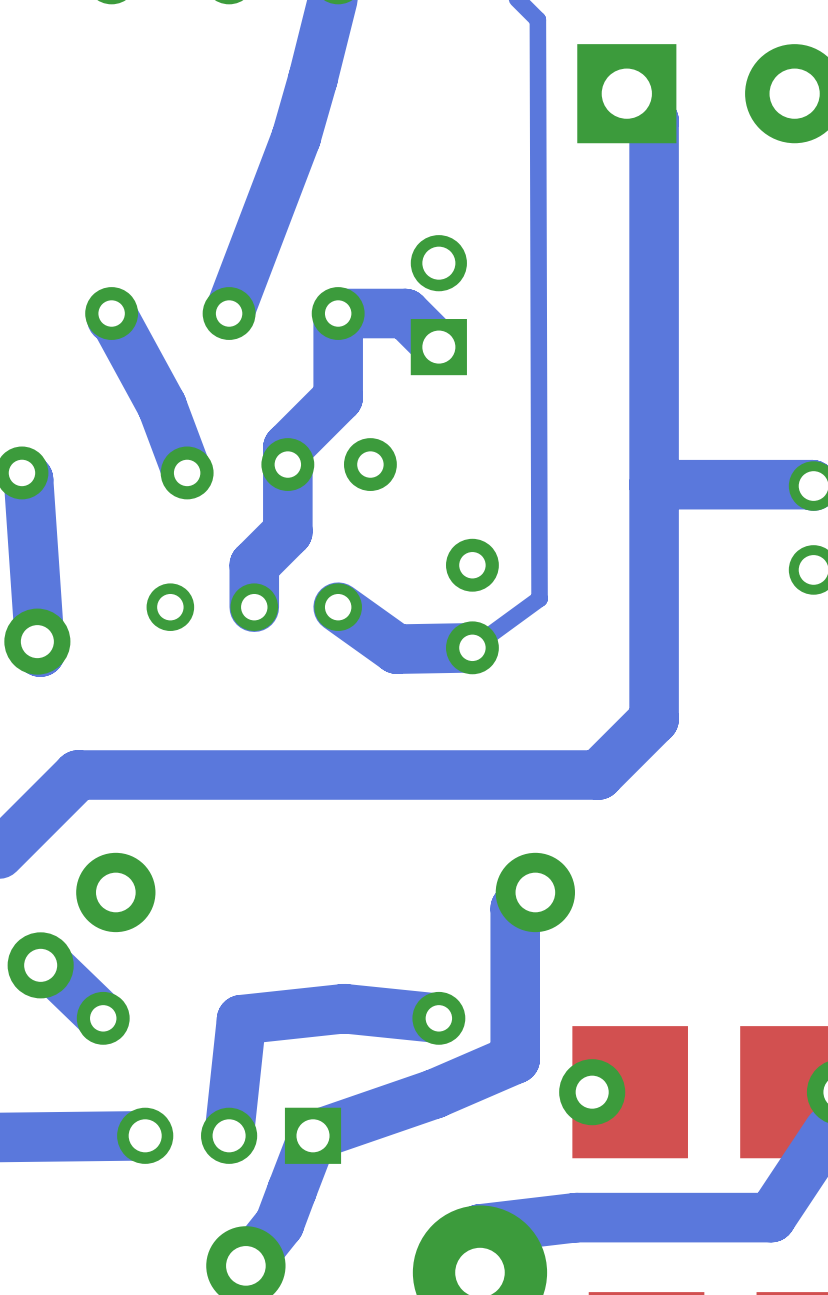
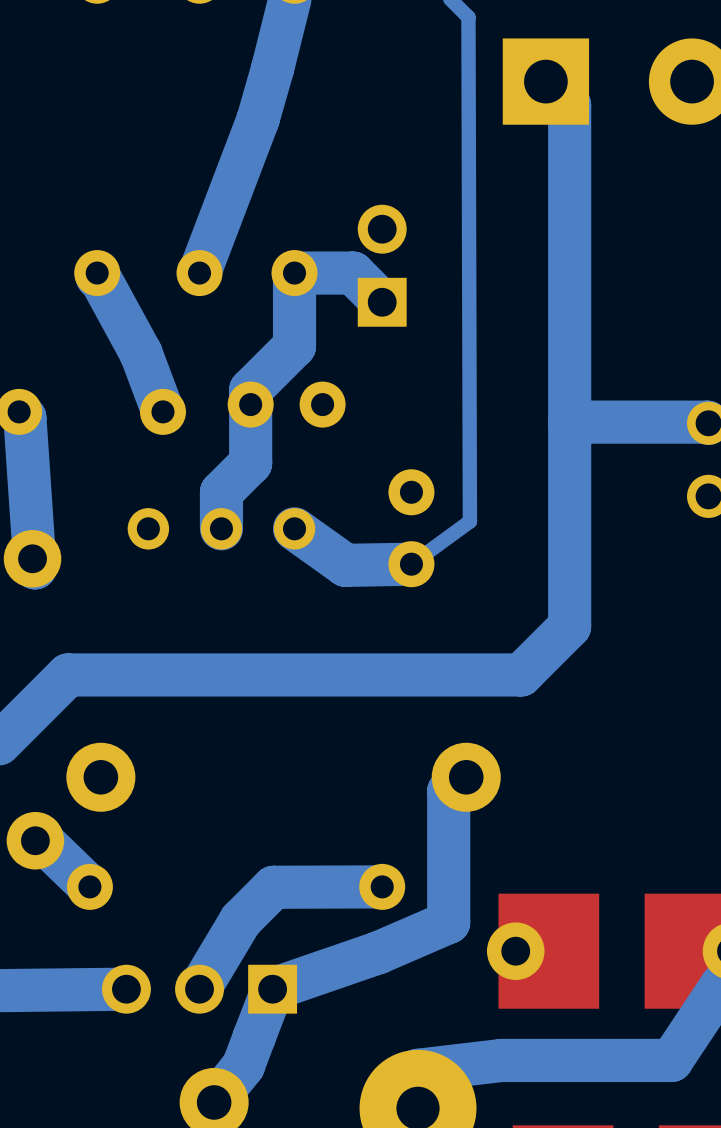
bottom track: (438, 1018) (344, 1008) (241, 1019) (229, 1135) -> (382, 886) (273, 887) (240, 920) (199, 989)

